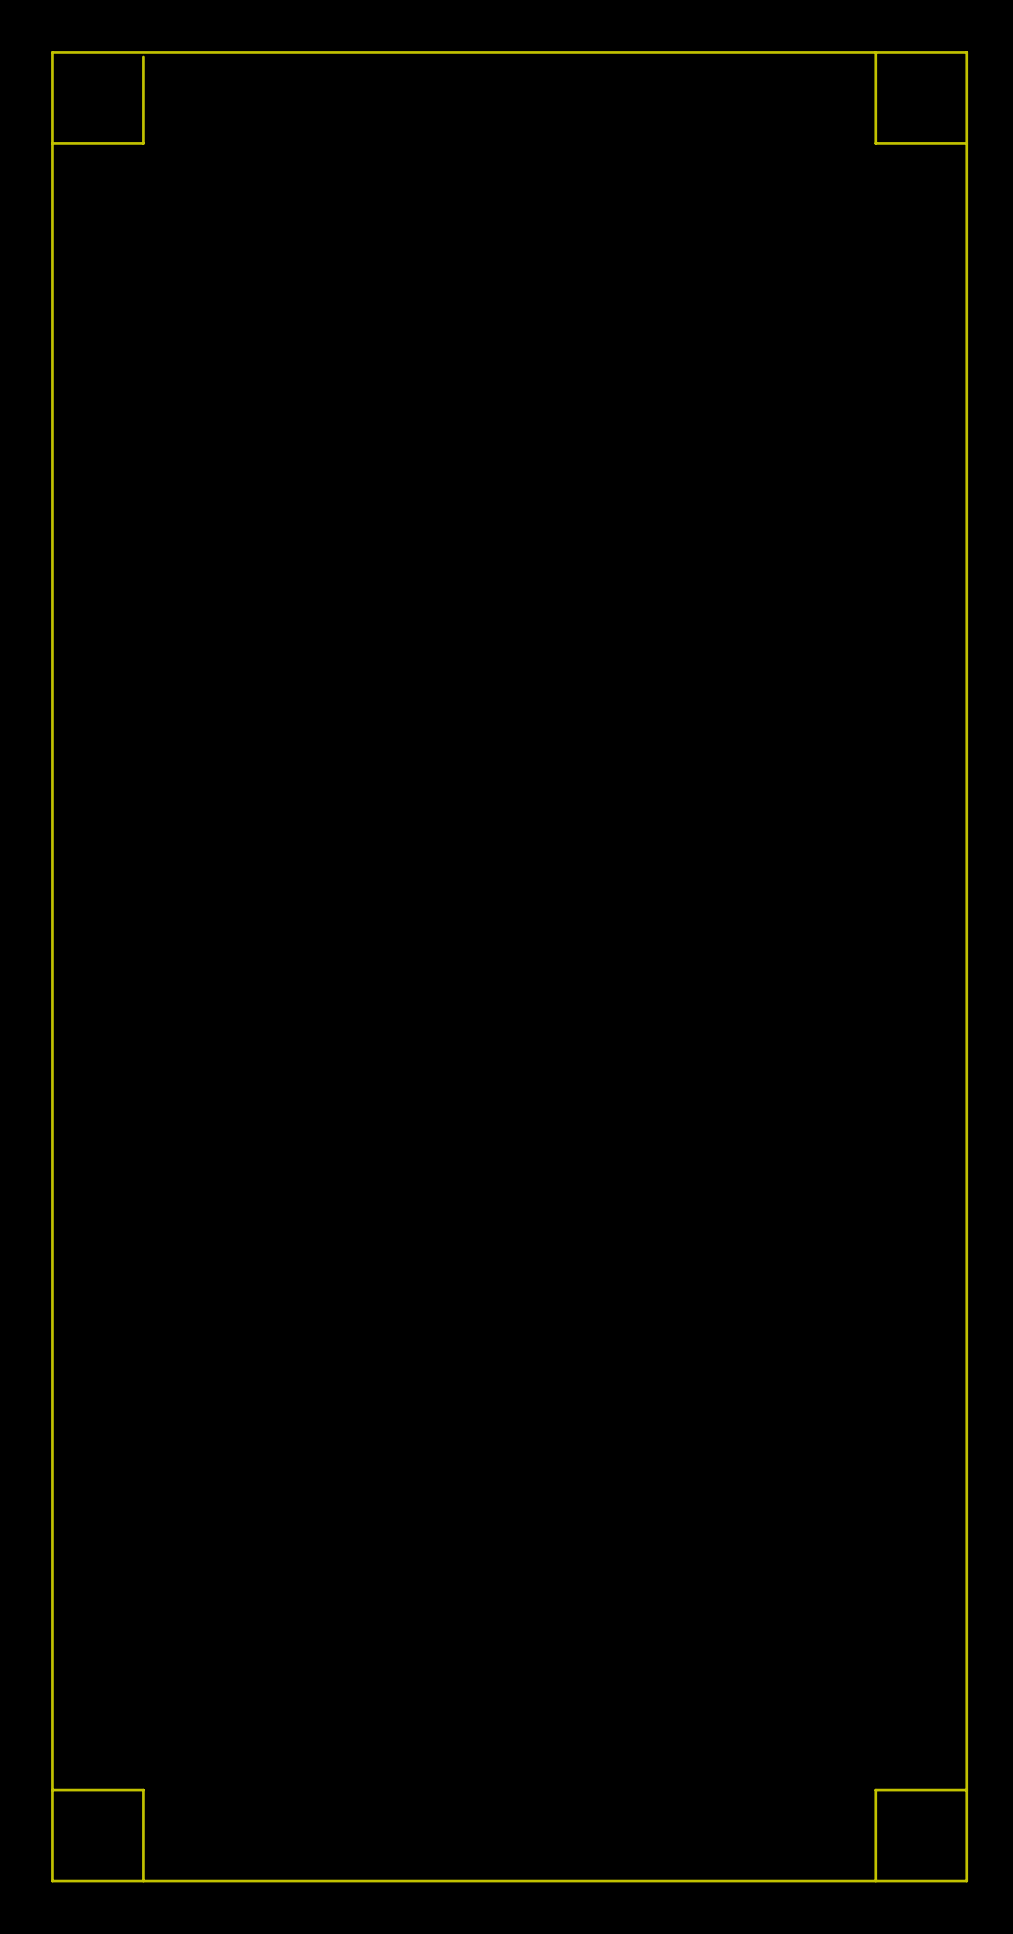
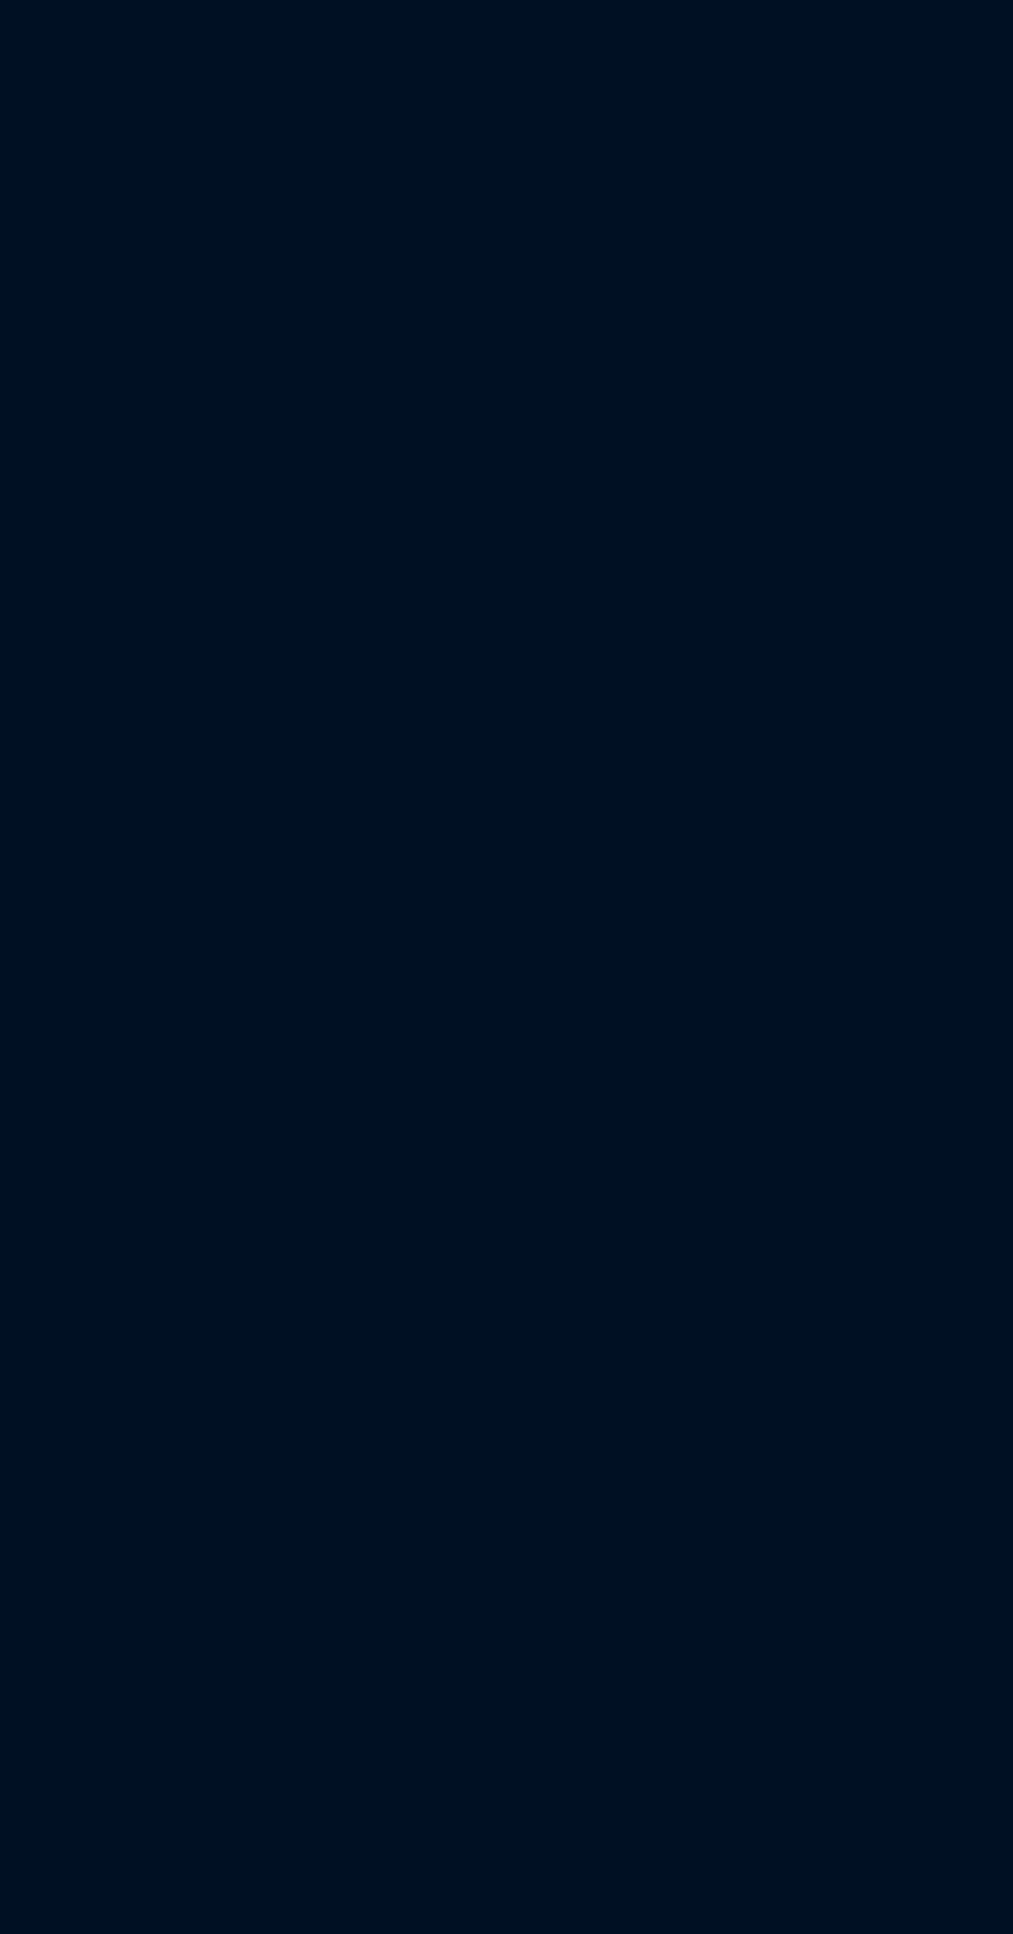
board edge: (875, 52) (875, 143) (966, 143) -> none
board edge: (966, 52) (52, 52) (52, 1881) (966, 1881) (966, 52) -> none
board edge: (143, 56) (143, 143) (52, 143) -> none
board edge: (52, 1790) (143, 1790) (143, 1881) -> none
board edge: (966, 1790) (875, 1790) (875, 1881) -> none

